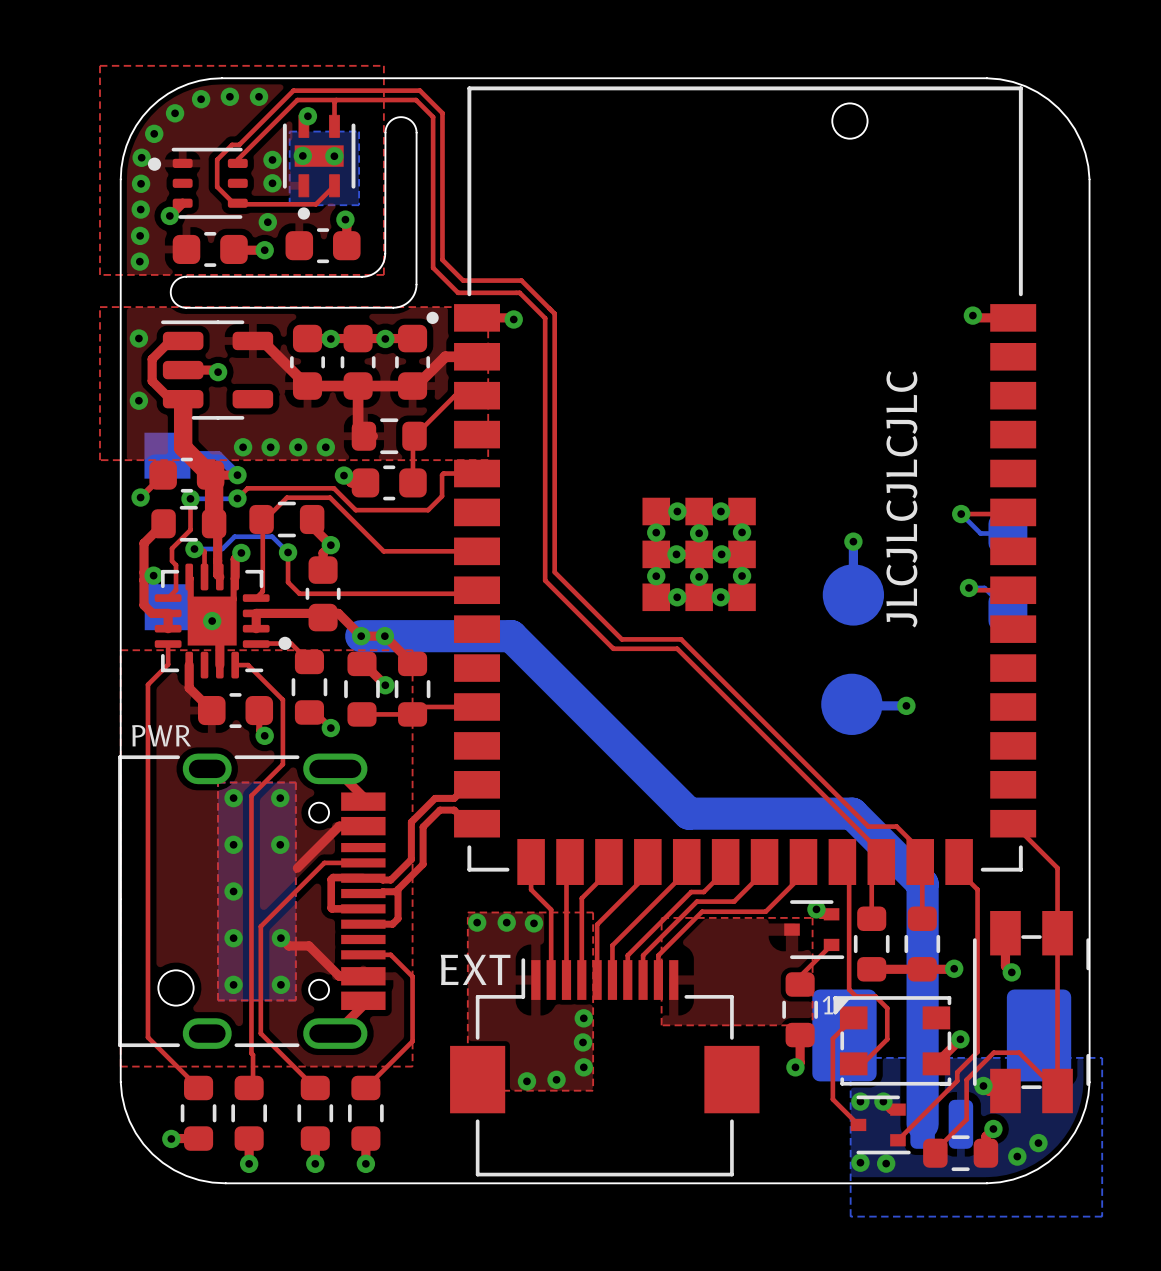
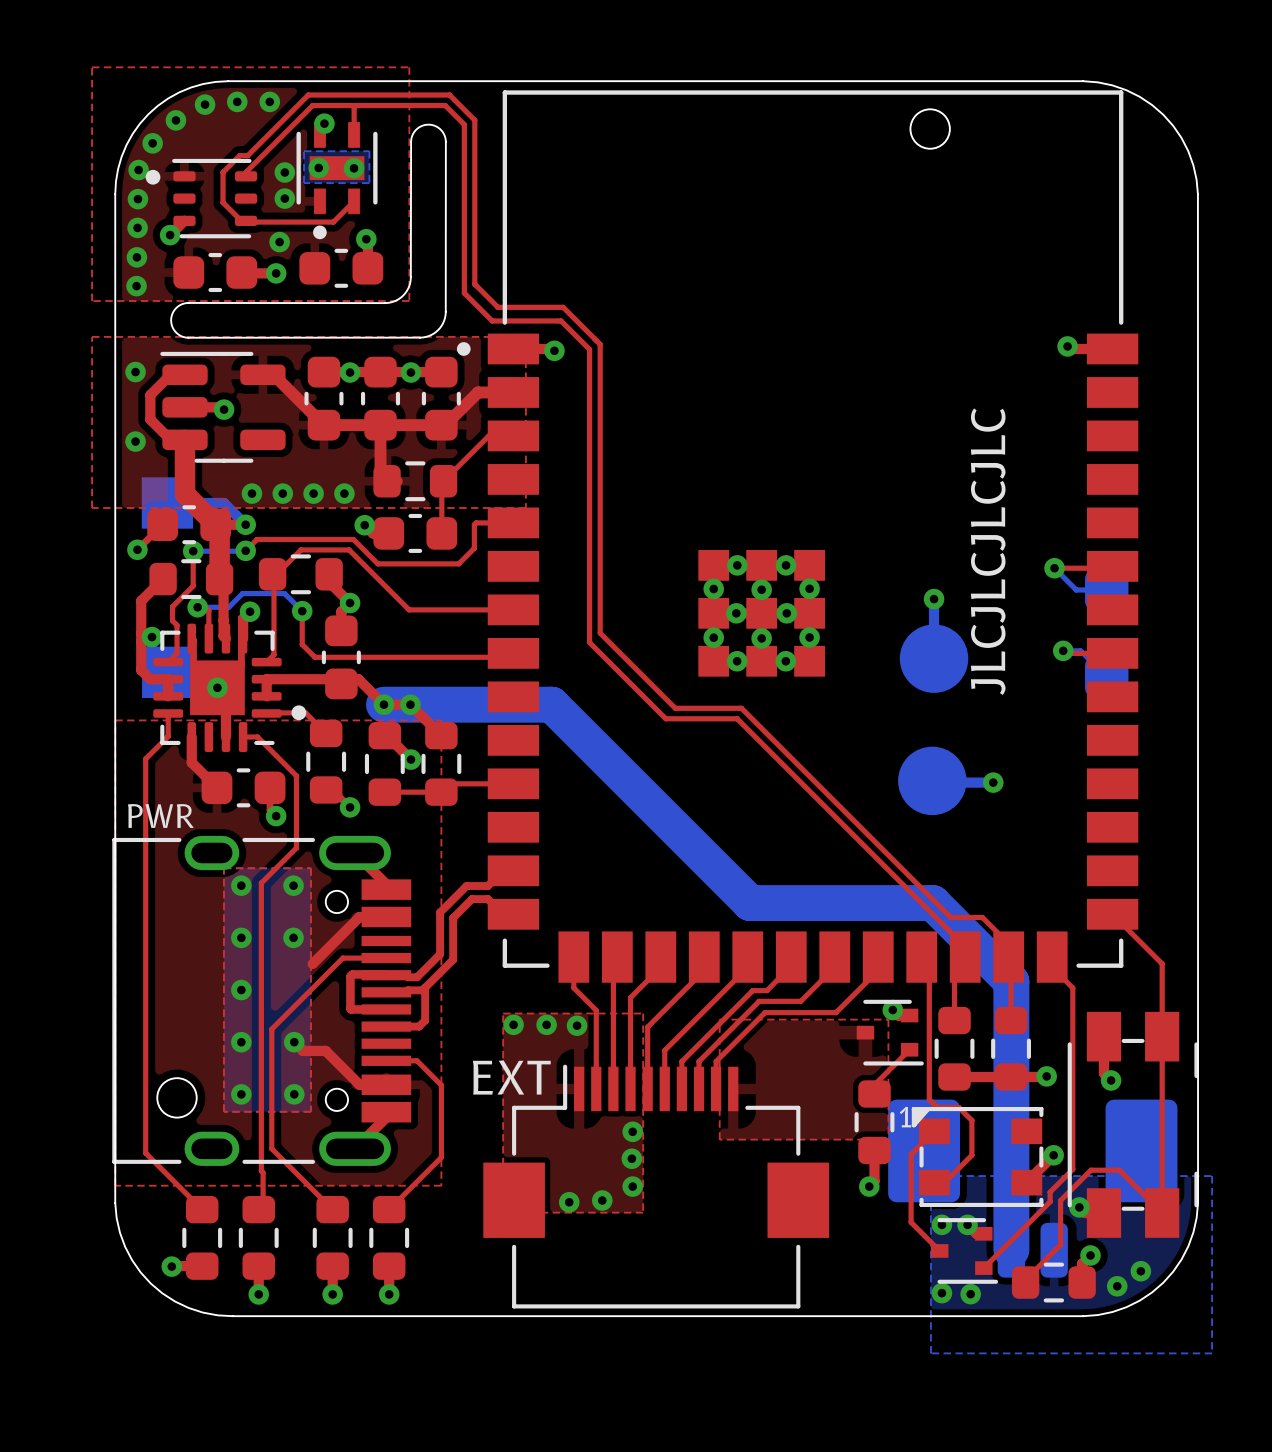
bottom zone outline: (289, 140) (289, 131) (359, 131) (359, 205) (289, 205) (289, 169) -> (304, 151) (369, 151) (369, 183) (304, 183)

